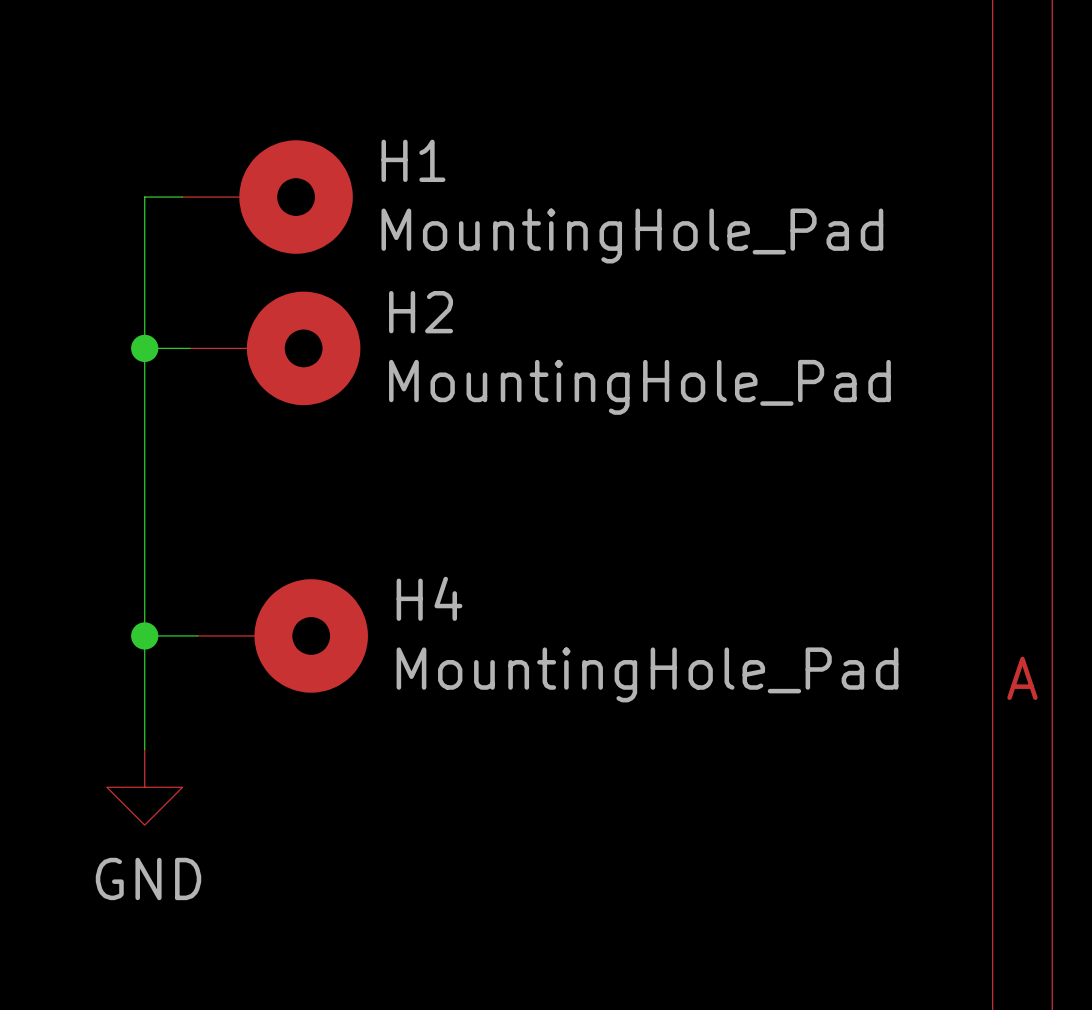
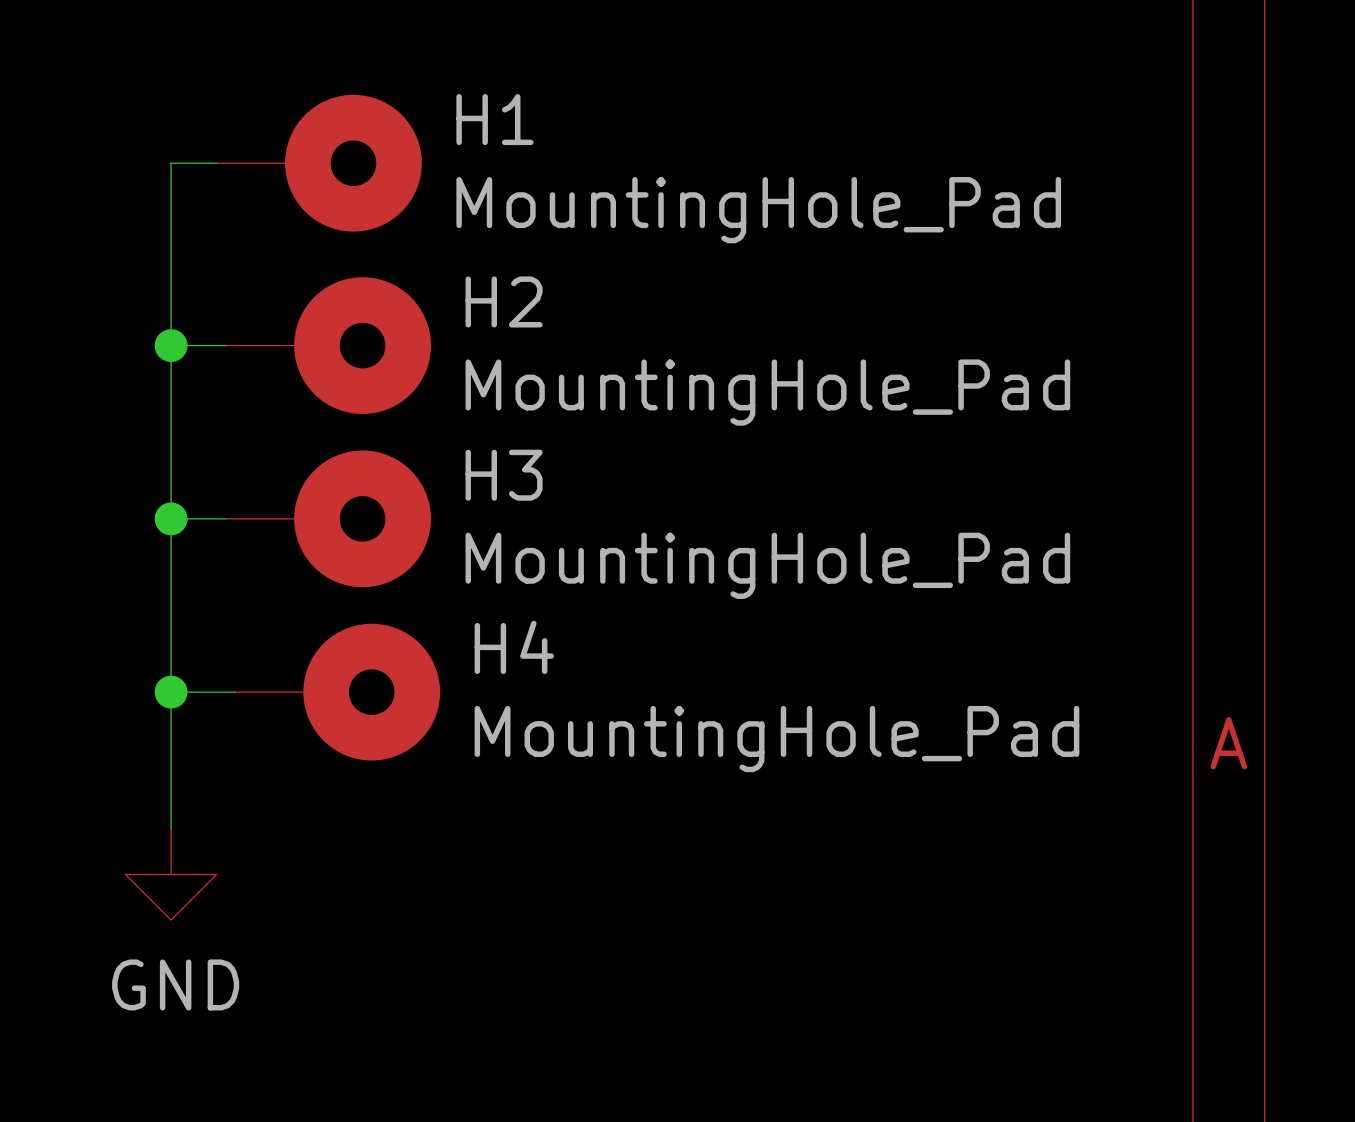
wire: none -> (171, 518) (225, 518)
junction: none -> (171, 518)
H3: none -> MountingHole_Pad (328, 518)

